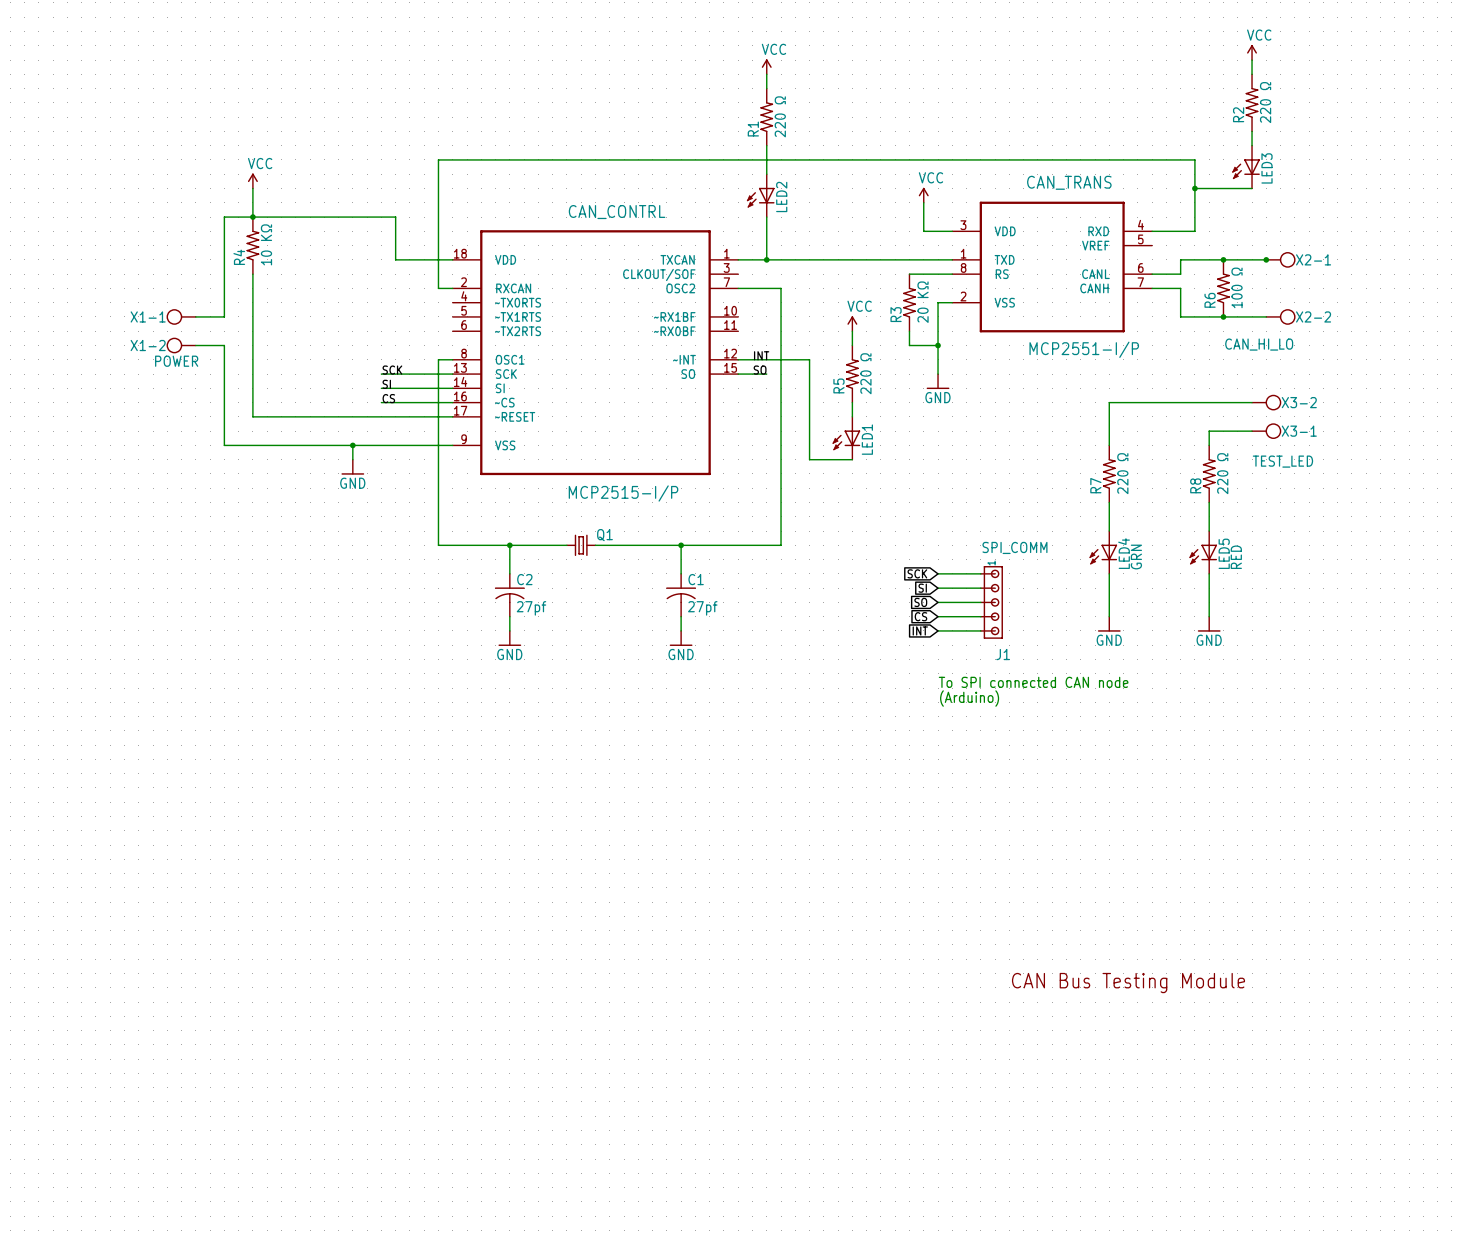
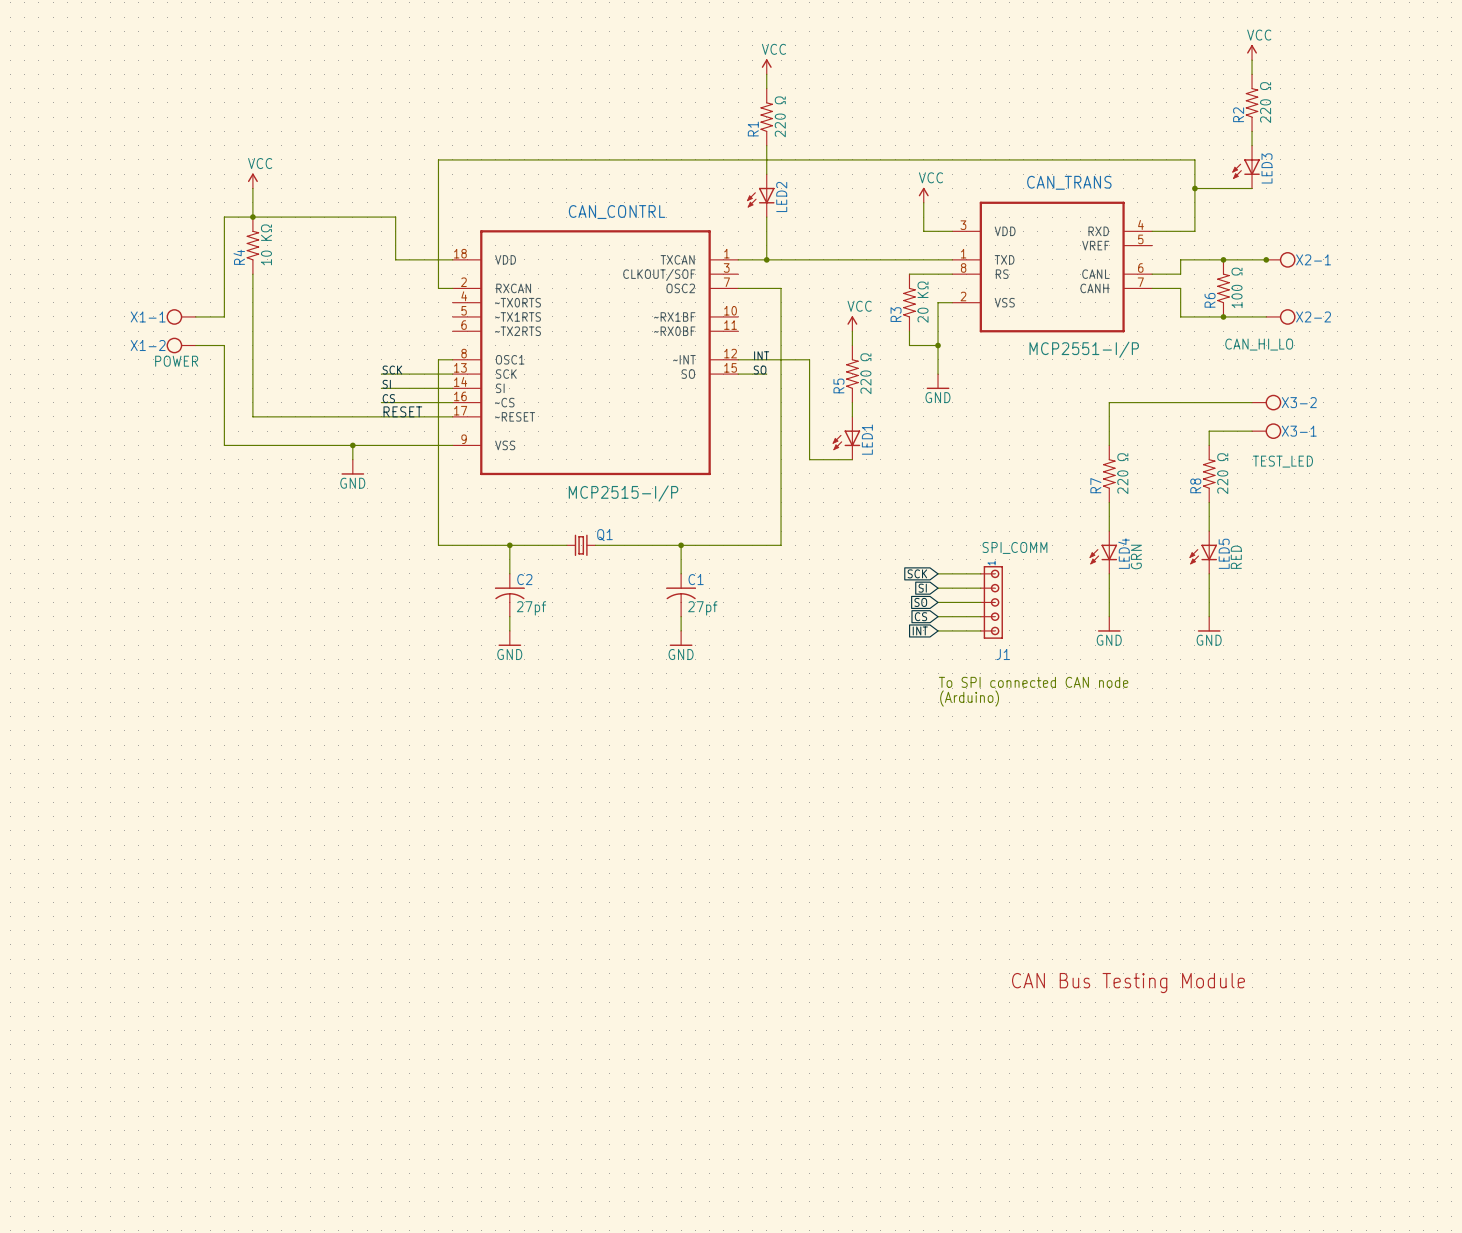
label: none -> RESET (402, 411)

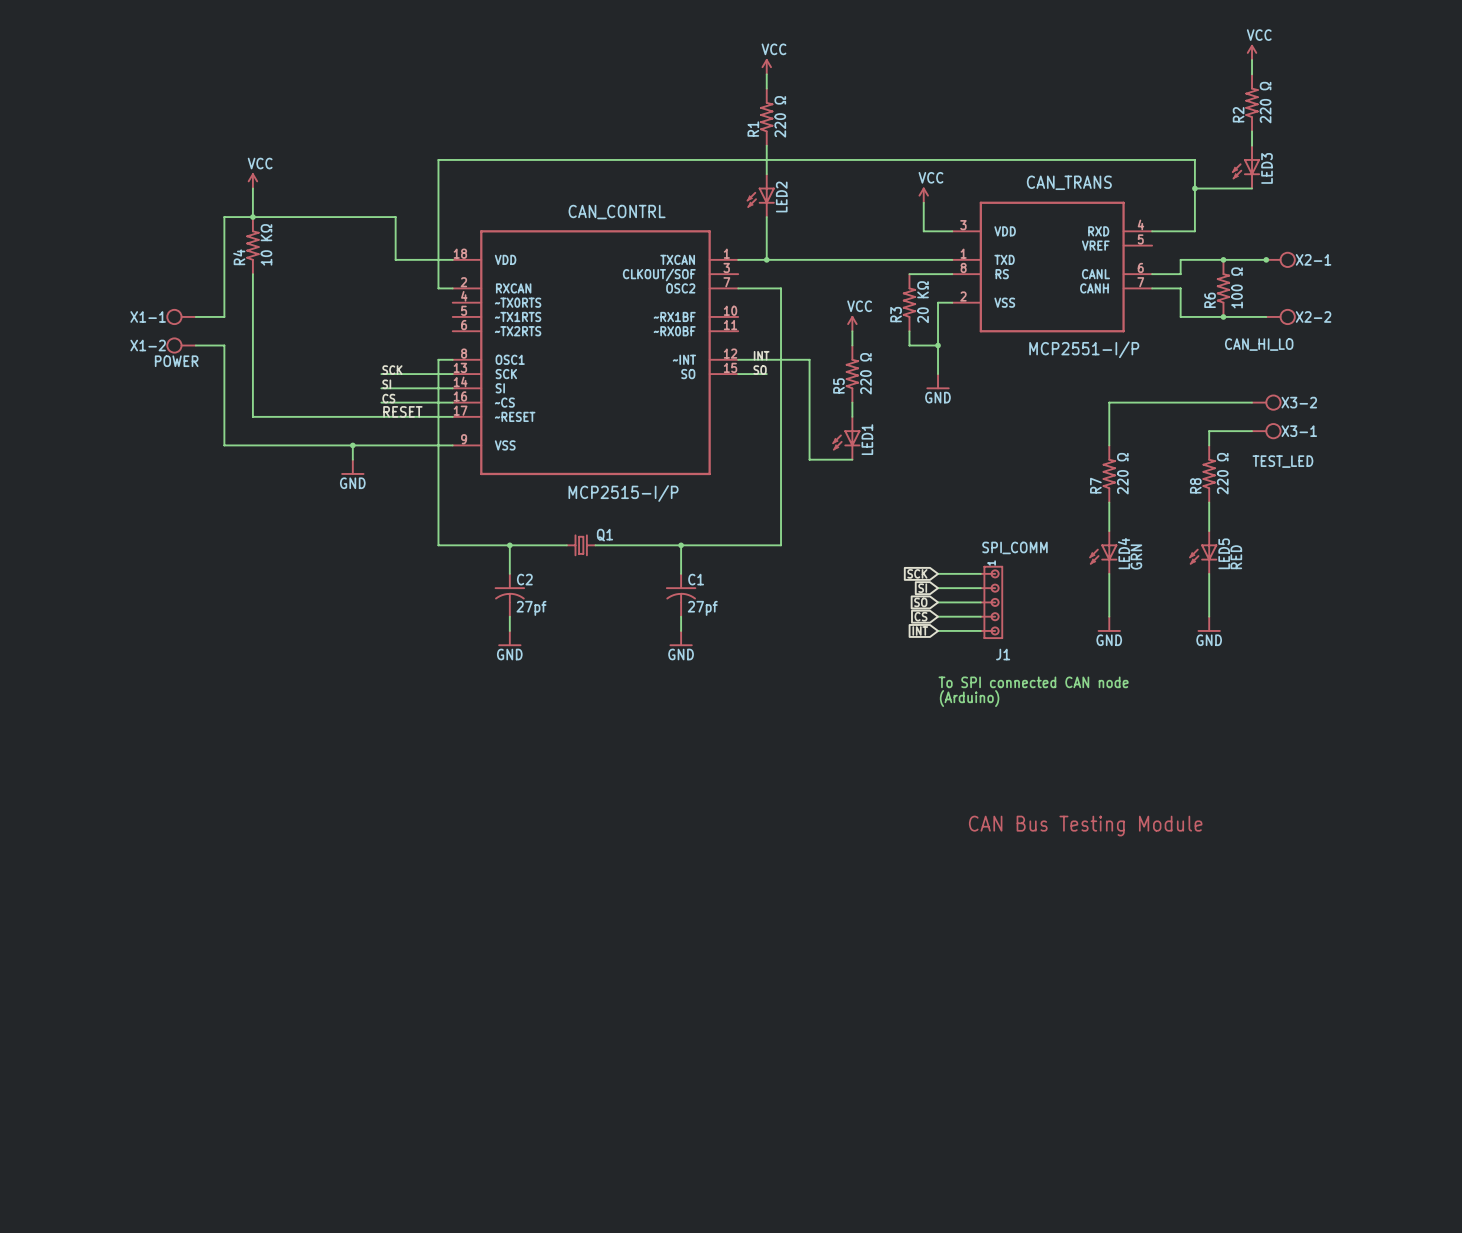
text: none -> CAN Bus Testing Module (1085, 826)
text: CAN Bus Testing Module (1128, 983) -> none

